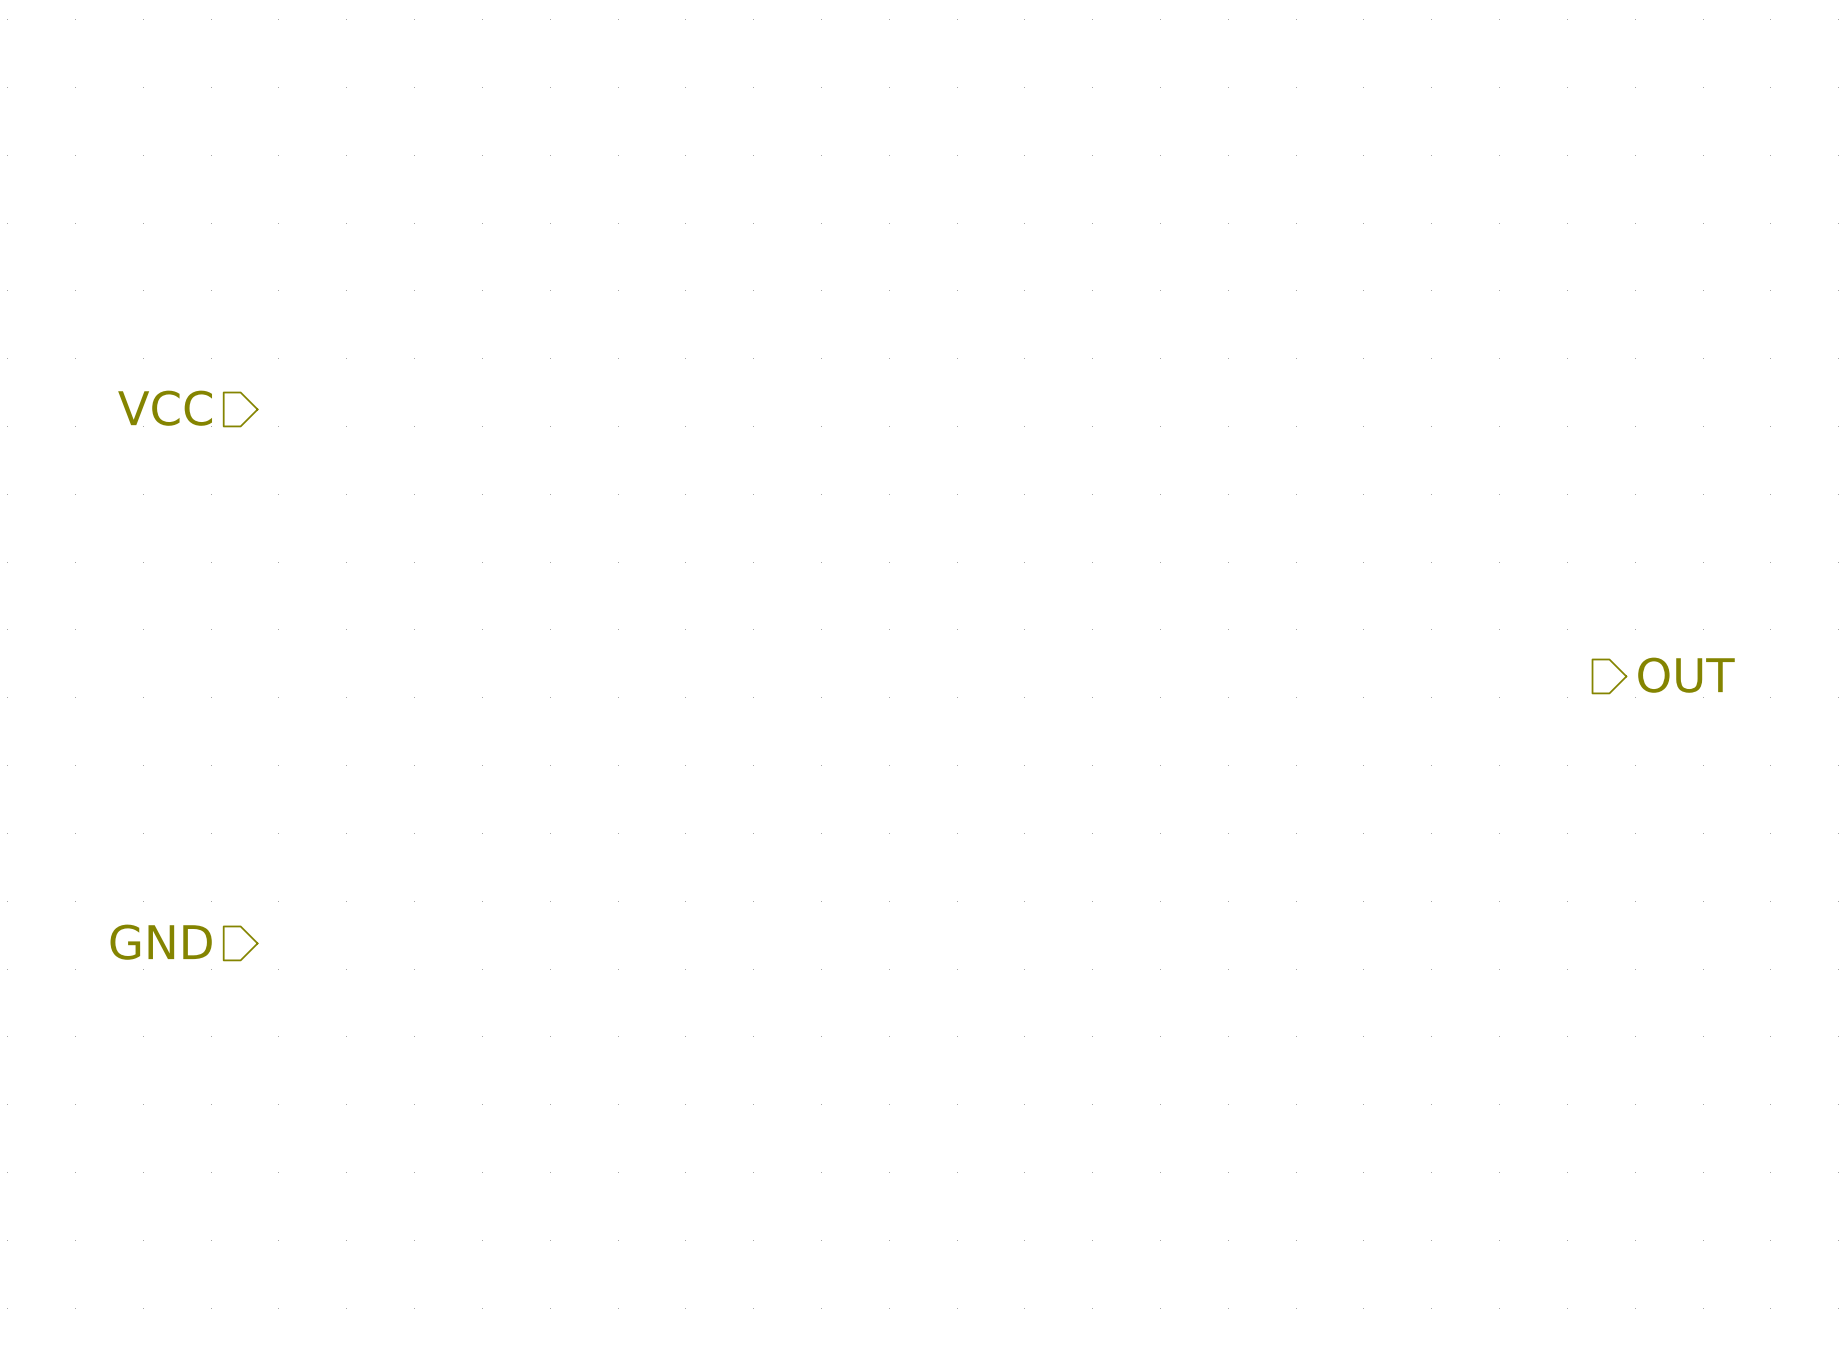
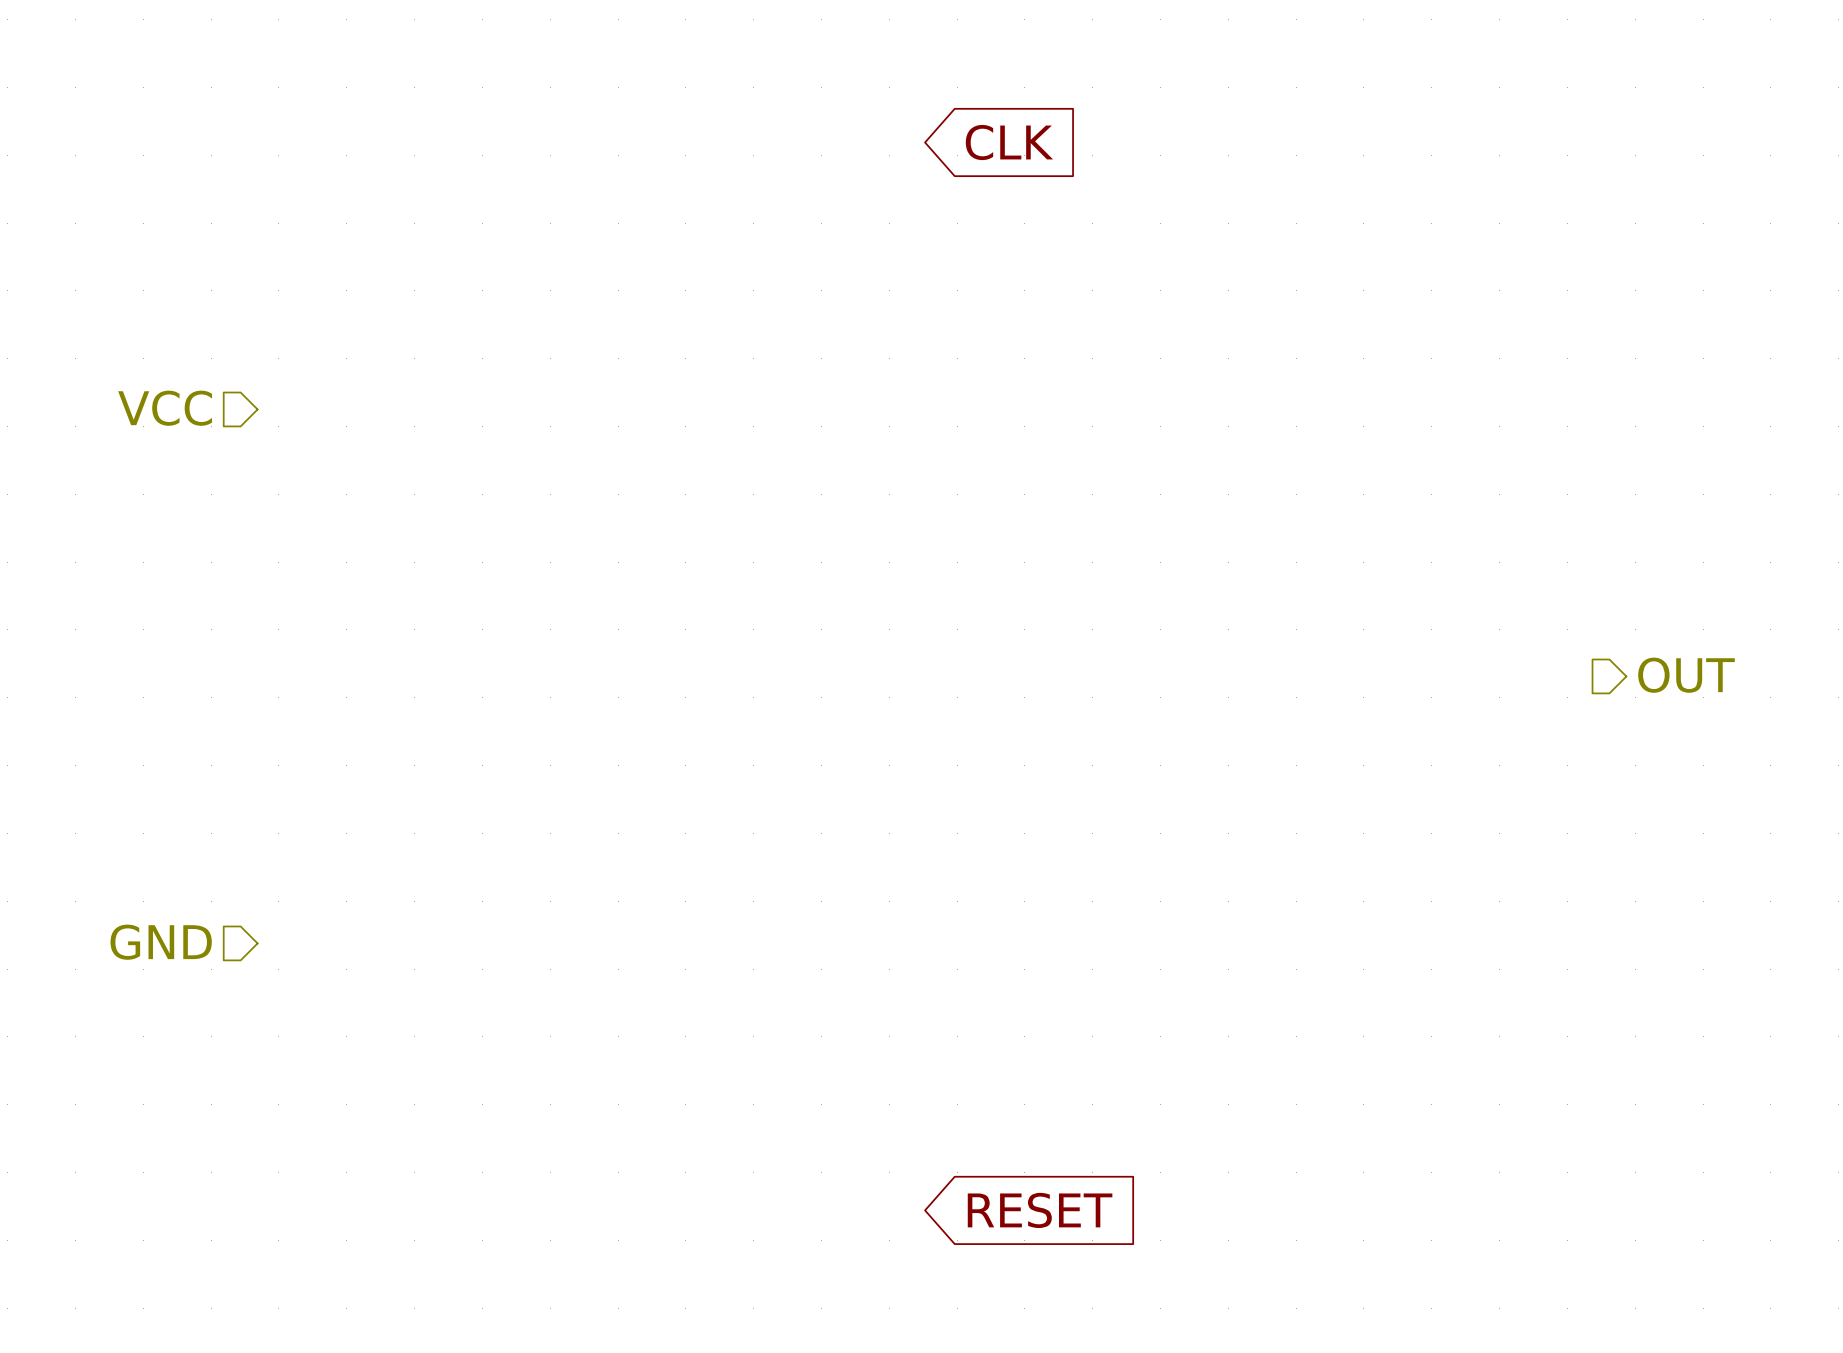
global label: none -> CLK (1009, 142)
global label: none -> RESET (1040, 1210)

